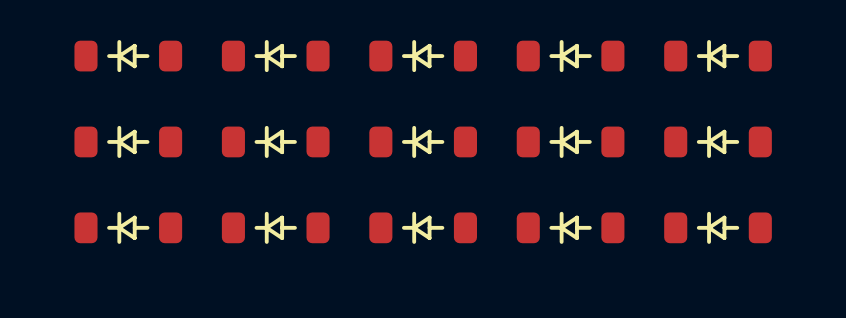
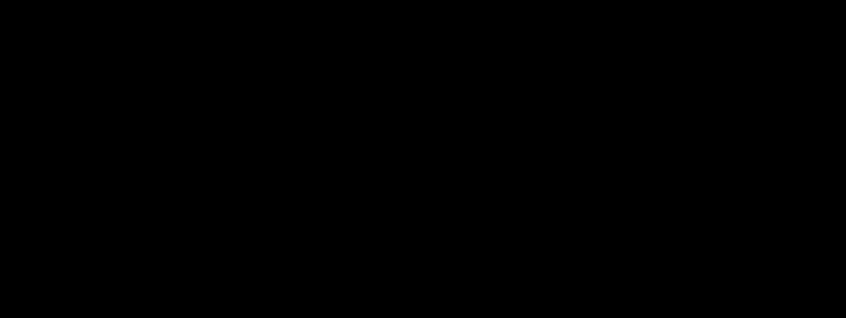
part: (128, 56) -> none
part: (275, 56) -> none
part: (423, 56) -> none
part: (570, 56) -> none
part: (718, 56) -> none
part: (128, 141) -> none
part: (275, 141) -> none
part: (423, 141) -> none
part: (570, 141) -> none
part: (718, 141) -> none
part: (128, 227) -> none
part: (275, 227) -> none
part: (423, 227) -> none
part: (570, 227) -> none
part: (718, 227) -> none

